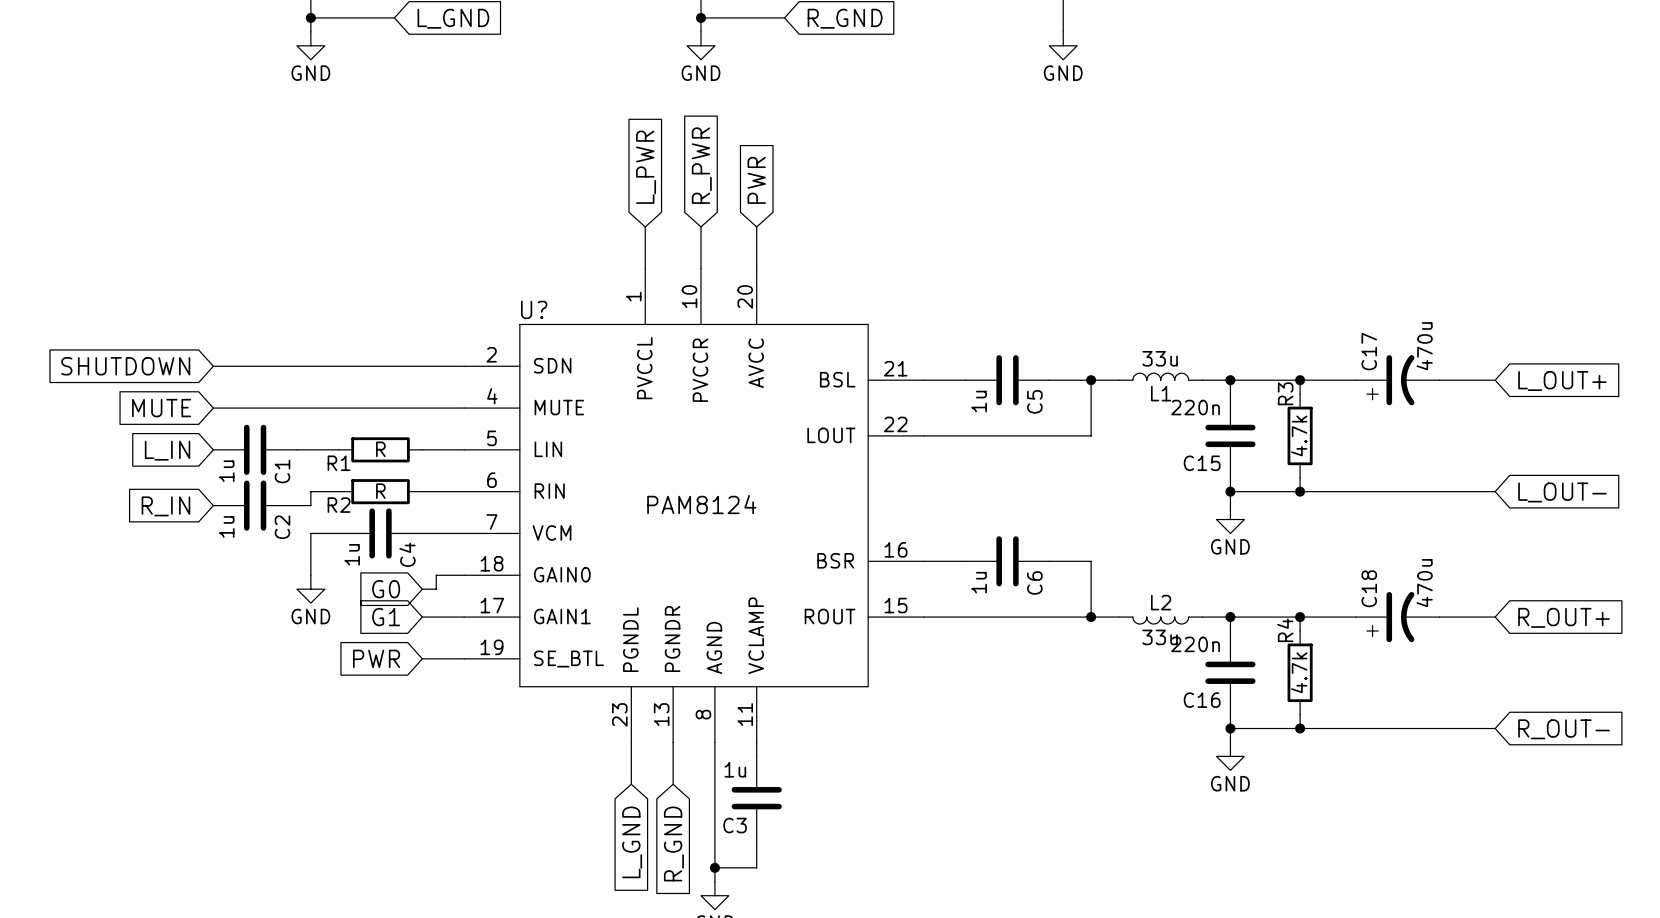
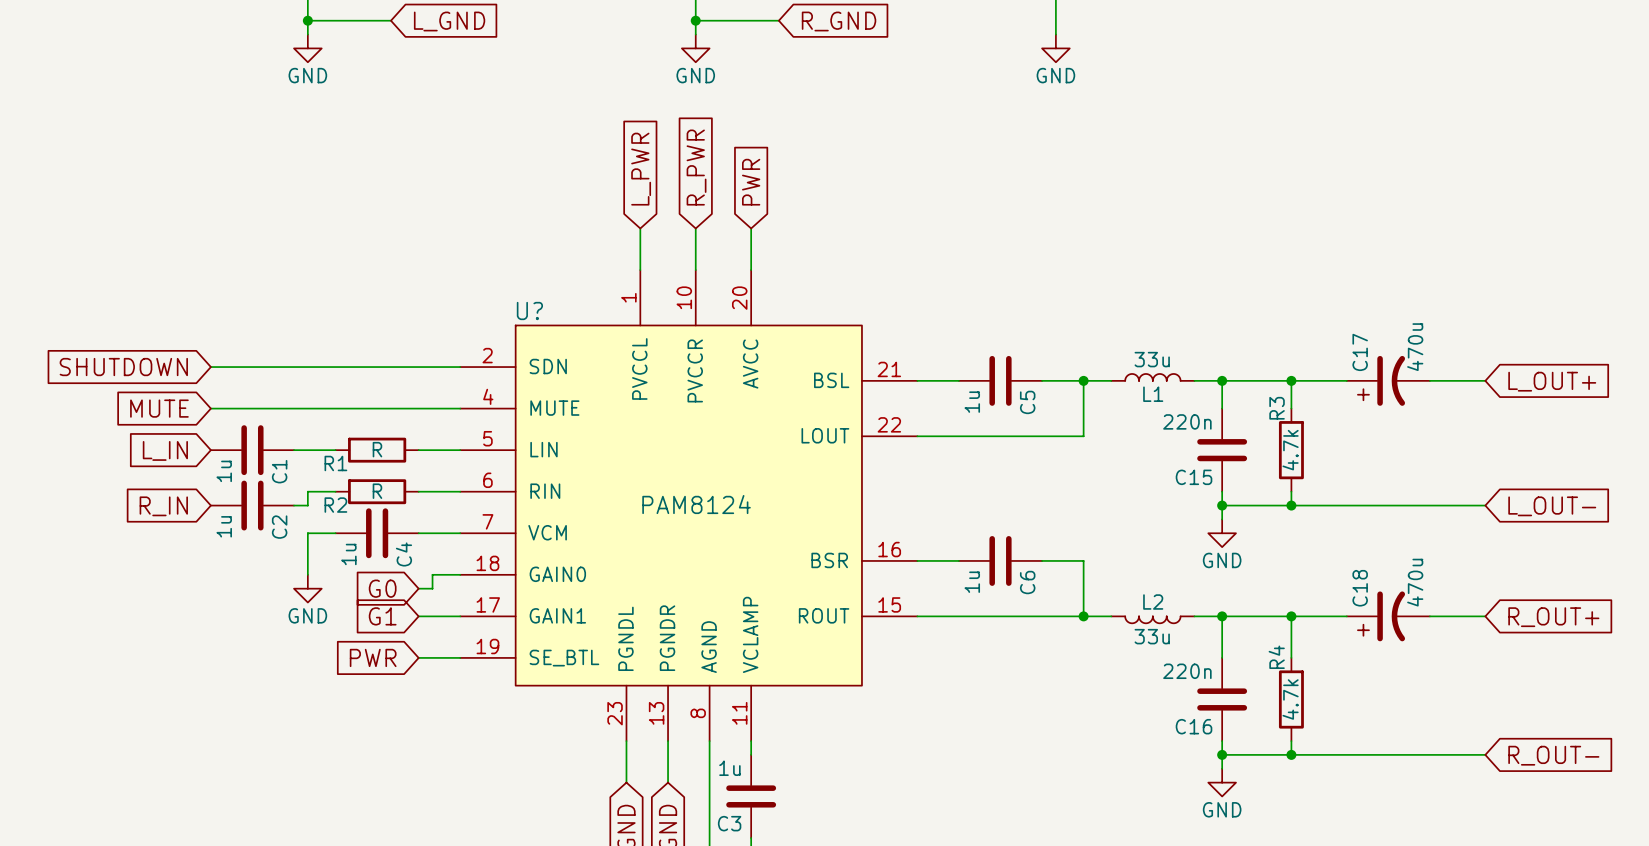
C15 position: (1230, 435) -> (1222, 450)
R3 position: (1300, 435) -> (1291, 450)
wire: (1230, 477) (1230, 491) (1495, 491) -> none
junction position: (1230, 491) -> (1222, 505)
junction position: (1300, 491) -> (1291, 505)
global label position: L_OUT- (1562, 492) -> L_OUT- (1552, 506)
wire: none -> (1485, 505) (1222, 505) (1222, 519)
power symbol position: GND (1230, 519) -> GND (1222, 533)
C16 position: (1230, 672) -> (1222, 699)
R4 position: (1300, 672) -> (1291, 699)
wire: (1300, 714) (1300, 728) -> (1291, 741) (1291, 754)
wire: (1230, 728) (1495, 728) -> (1222, 754) (1485, 754)
junction position: (1230, 728) -> (1222, 754)
junction position: (1300, 728) -> (1291, 754)
global label position: R_OUT- (1564, 729) -> R_OUT- (1553, 755)
power symbol position: GND (1230, 756) -> GND (1222, 782)

